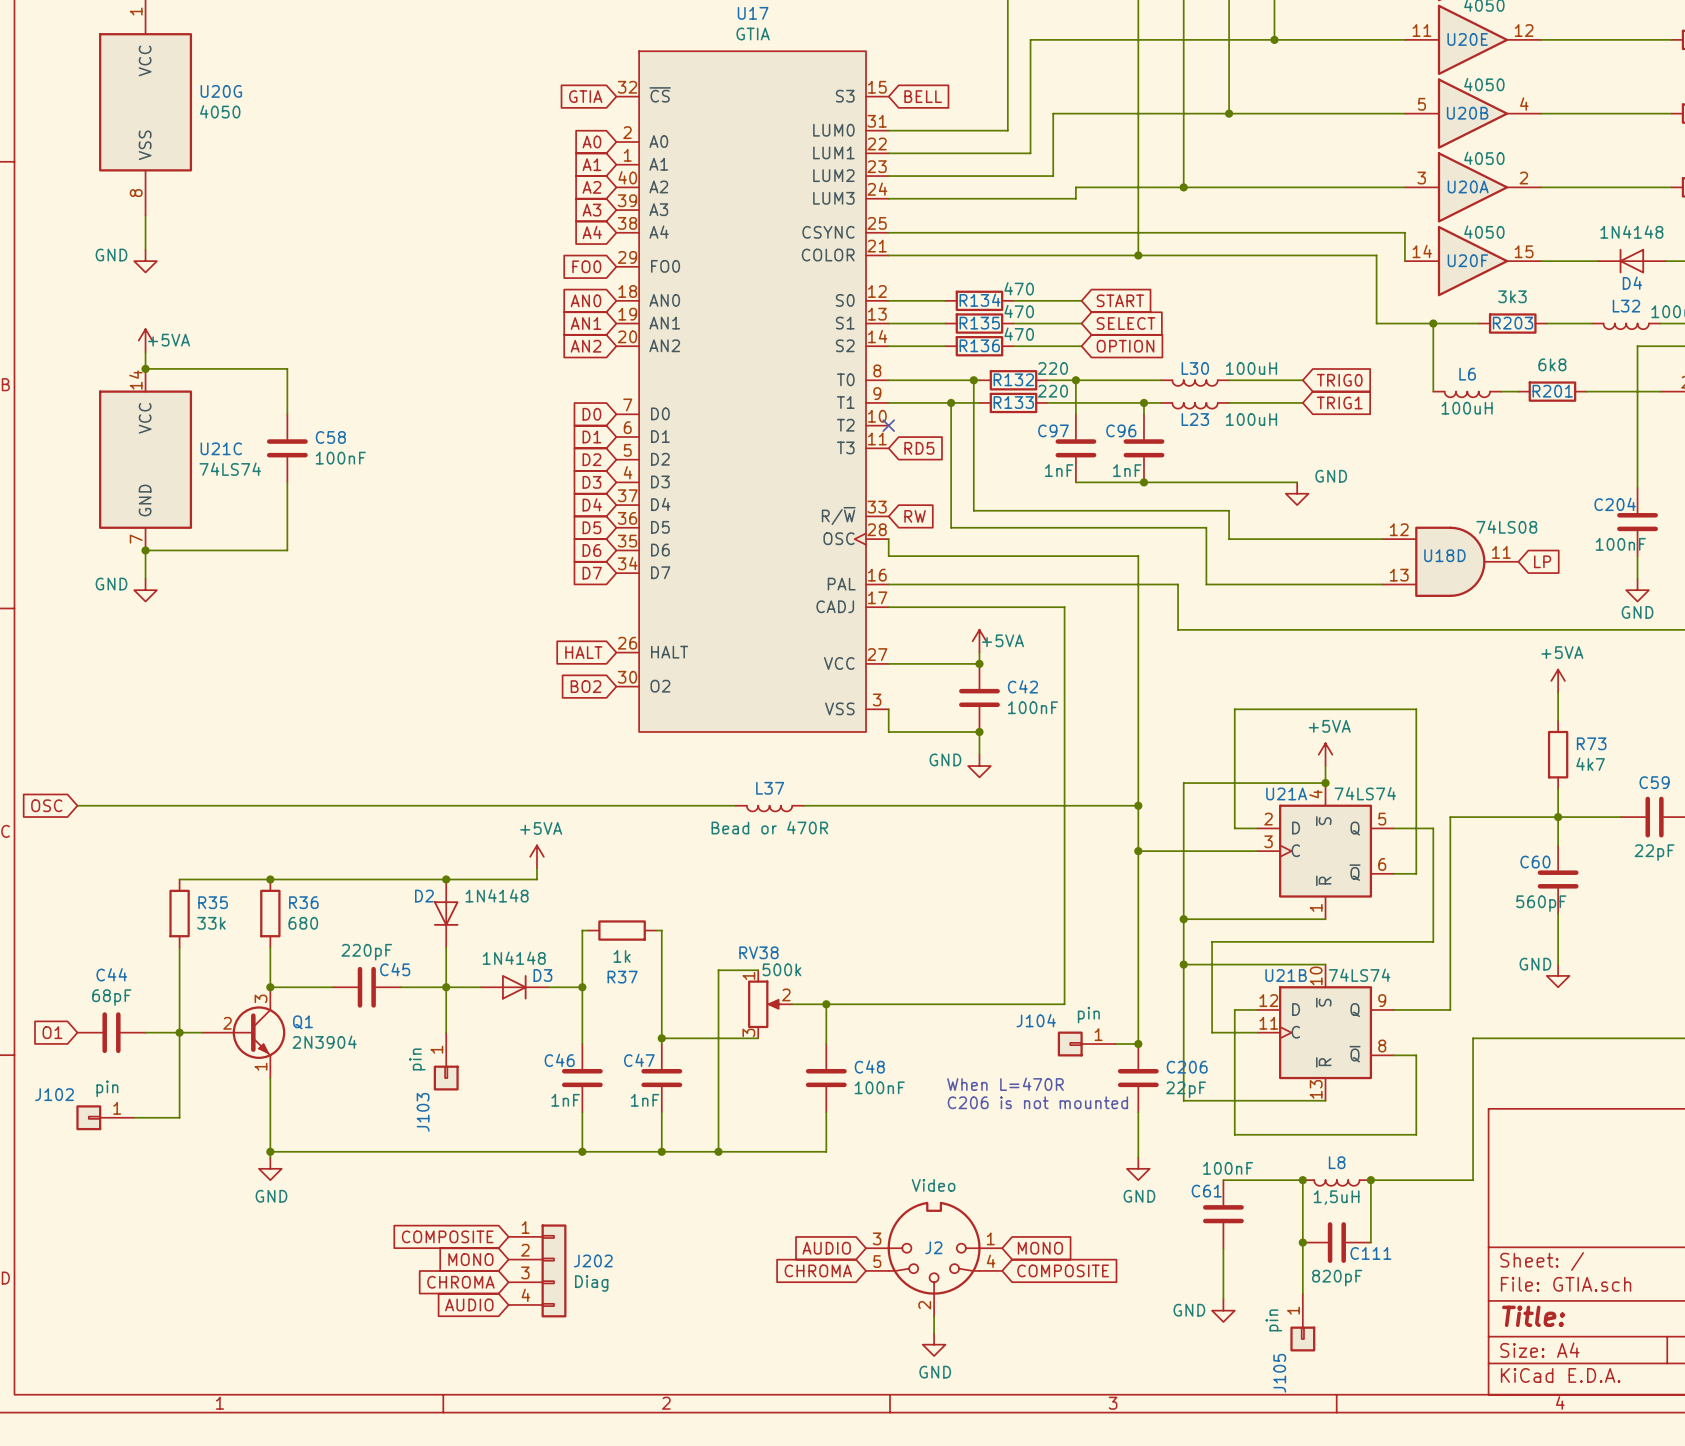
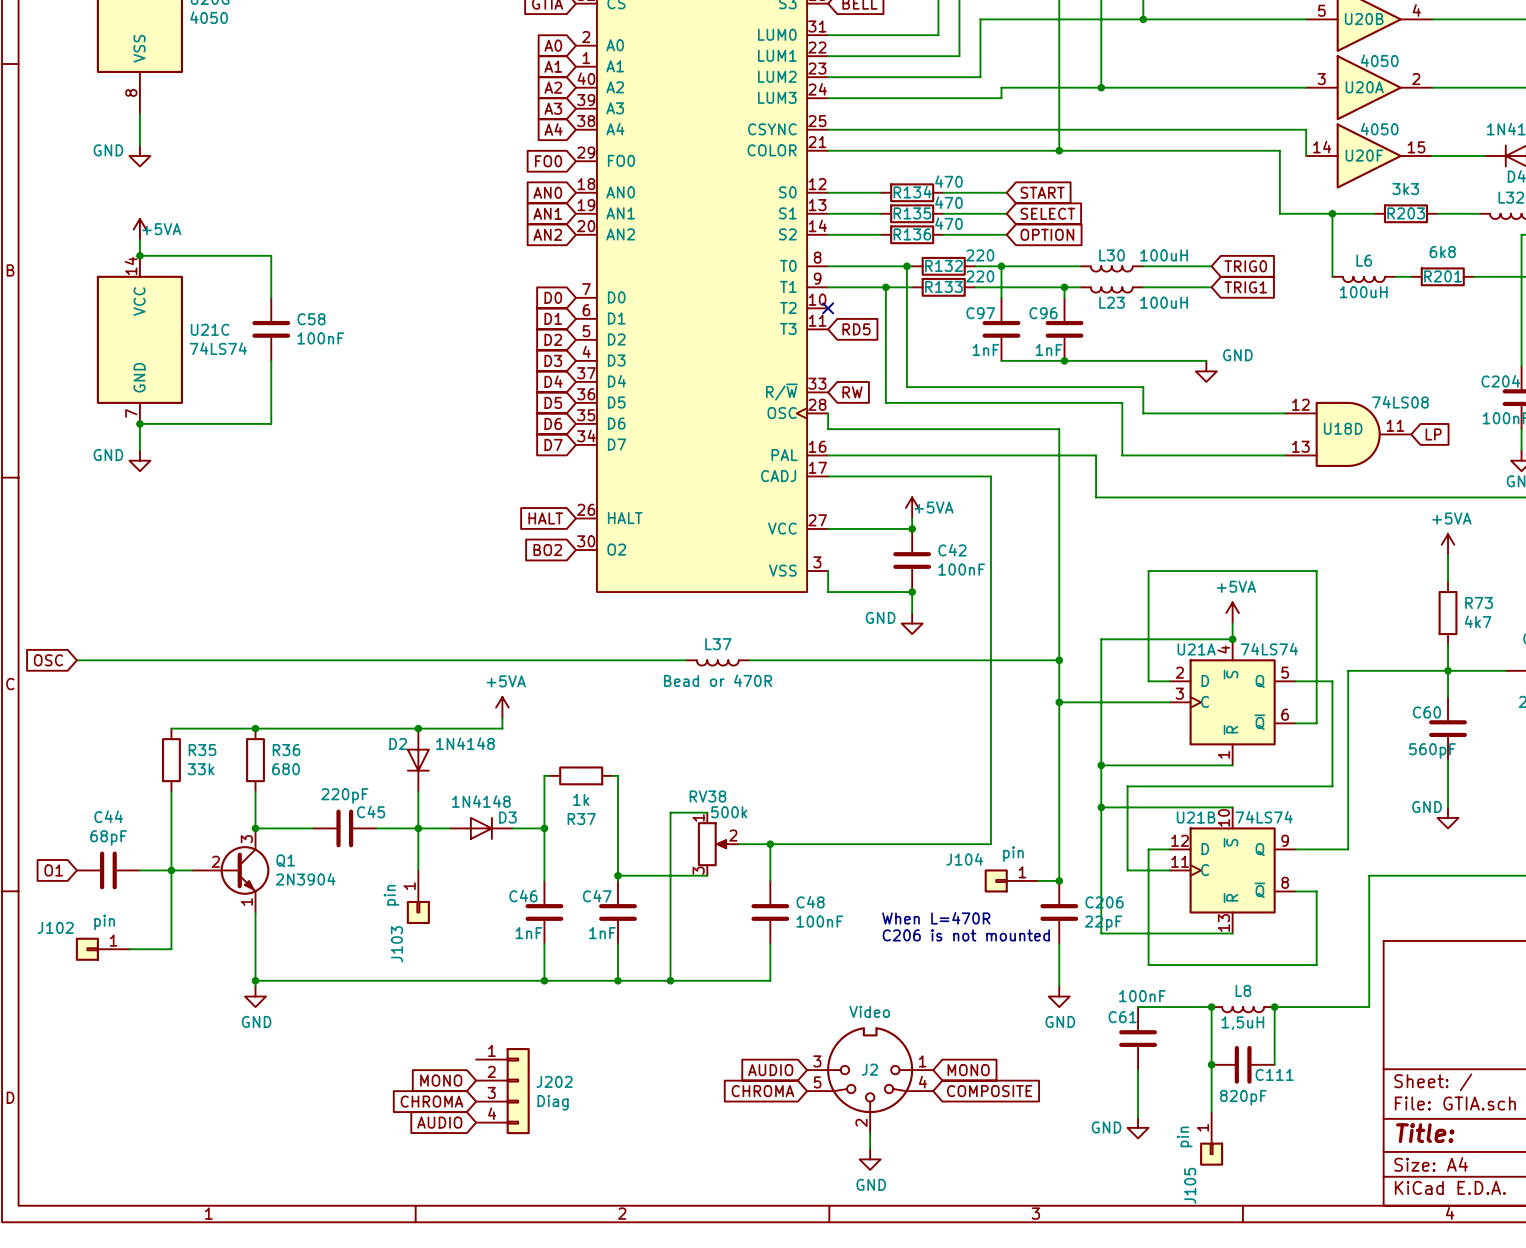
global label: COMPOSITE (447, 1236) -> none

